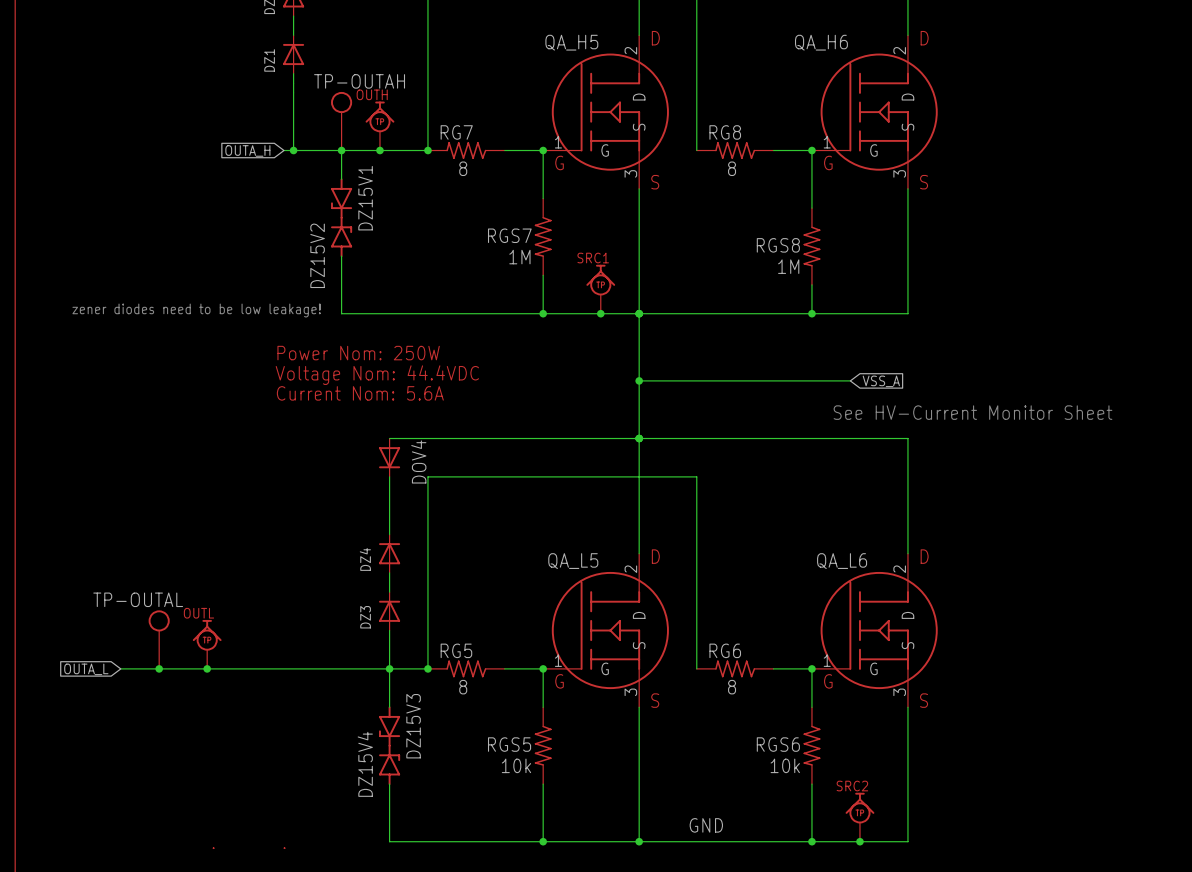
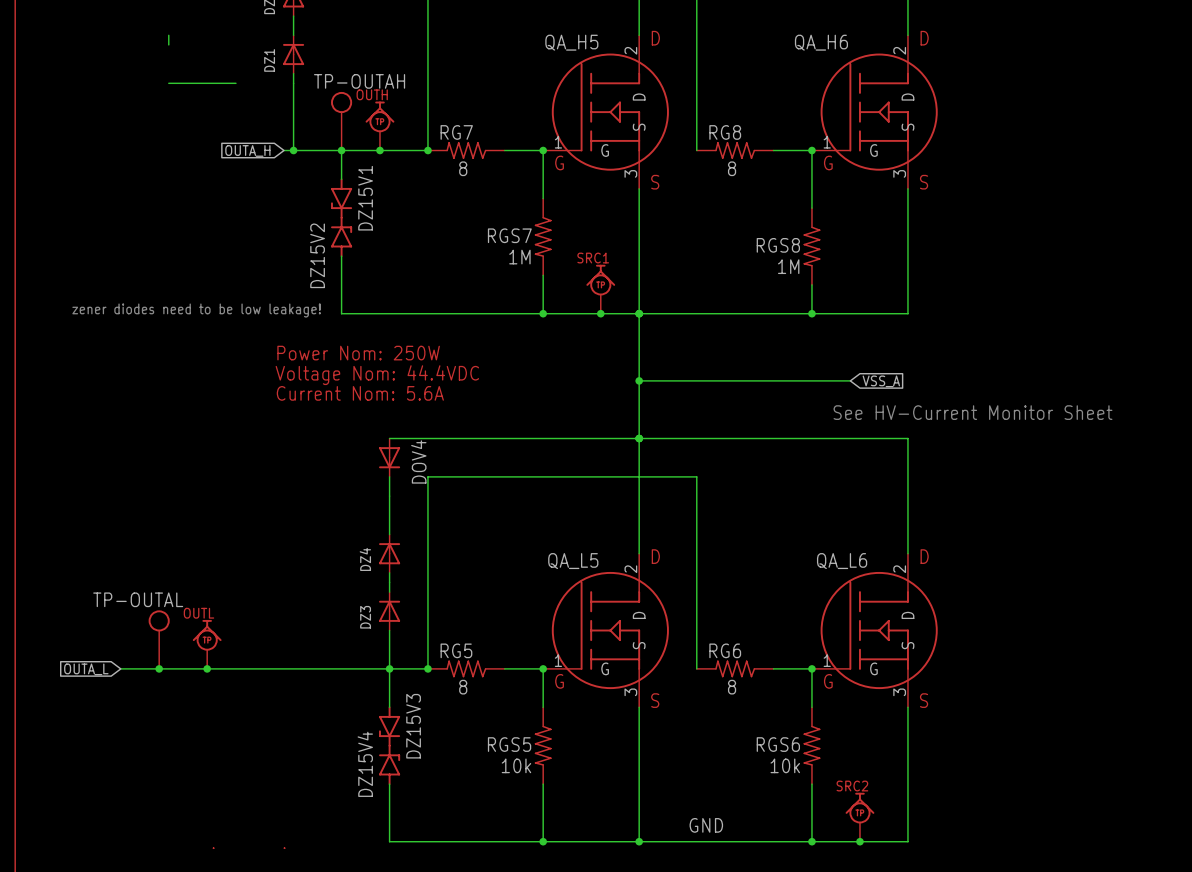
wire: none -> (168, 35) (168, 44)
wire: none -> (168, 83) (235, 83)

